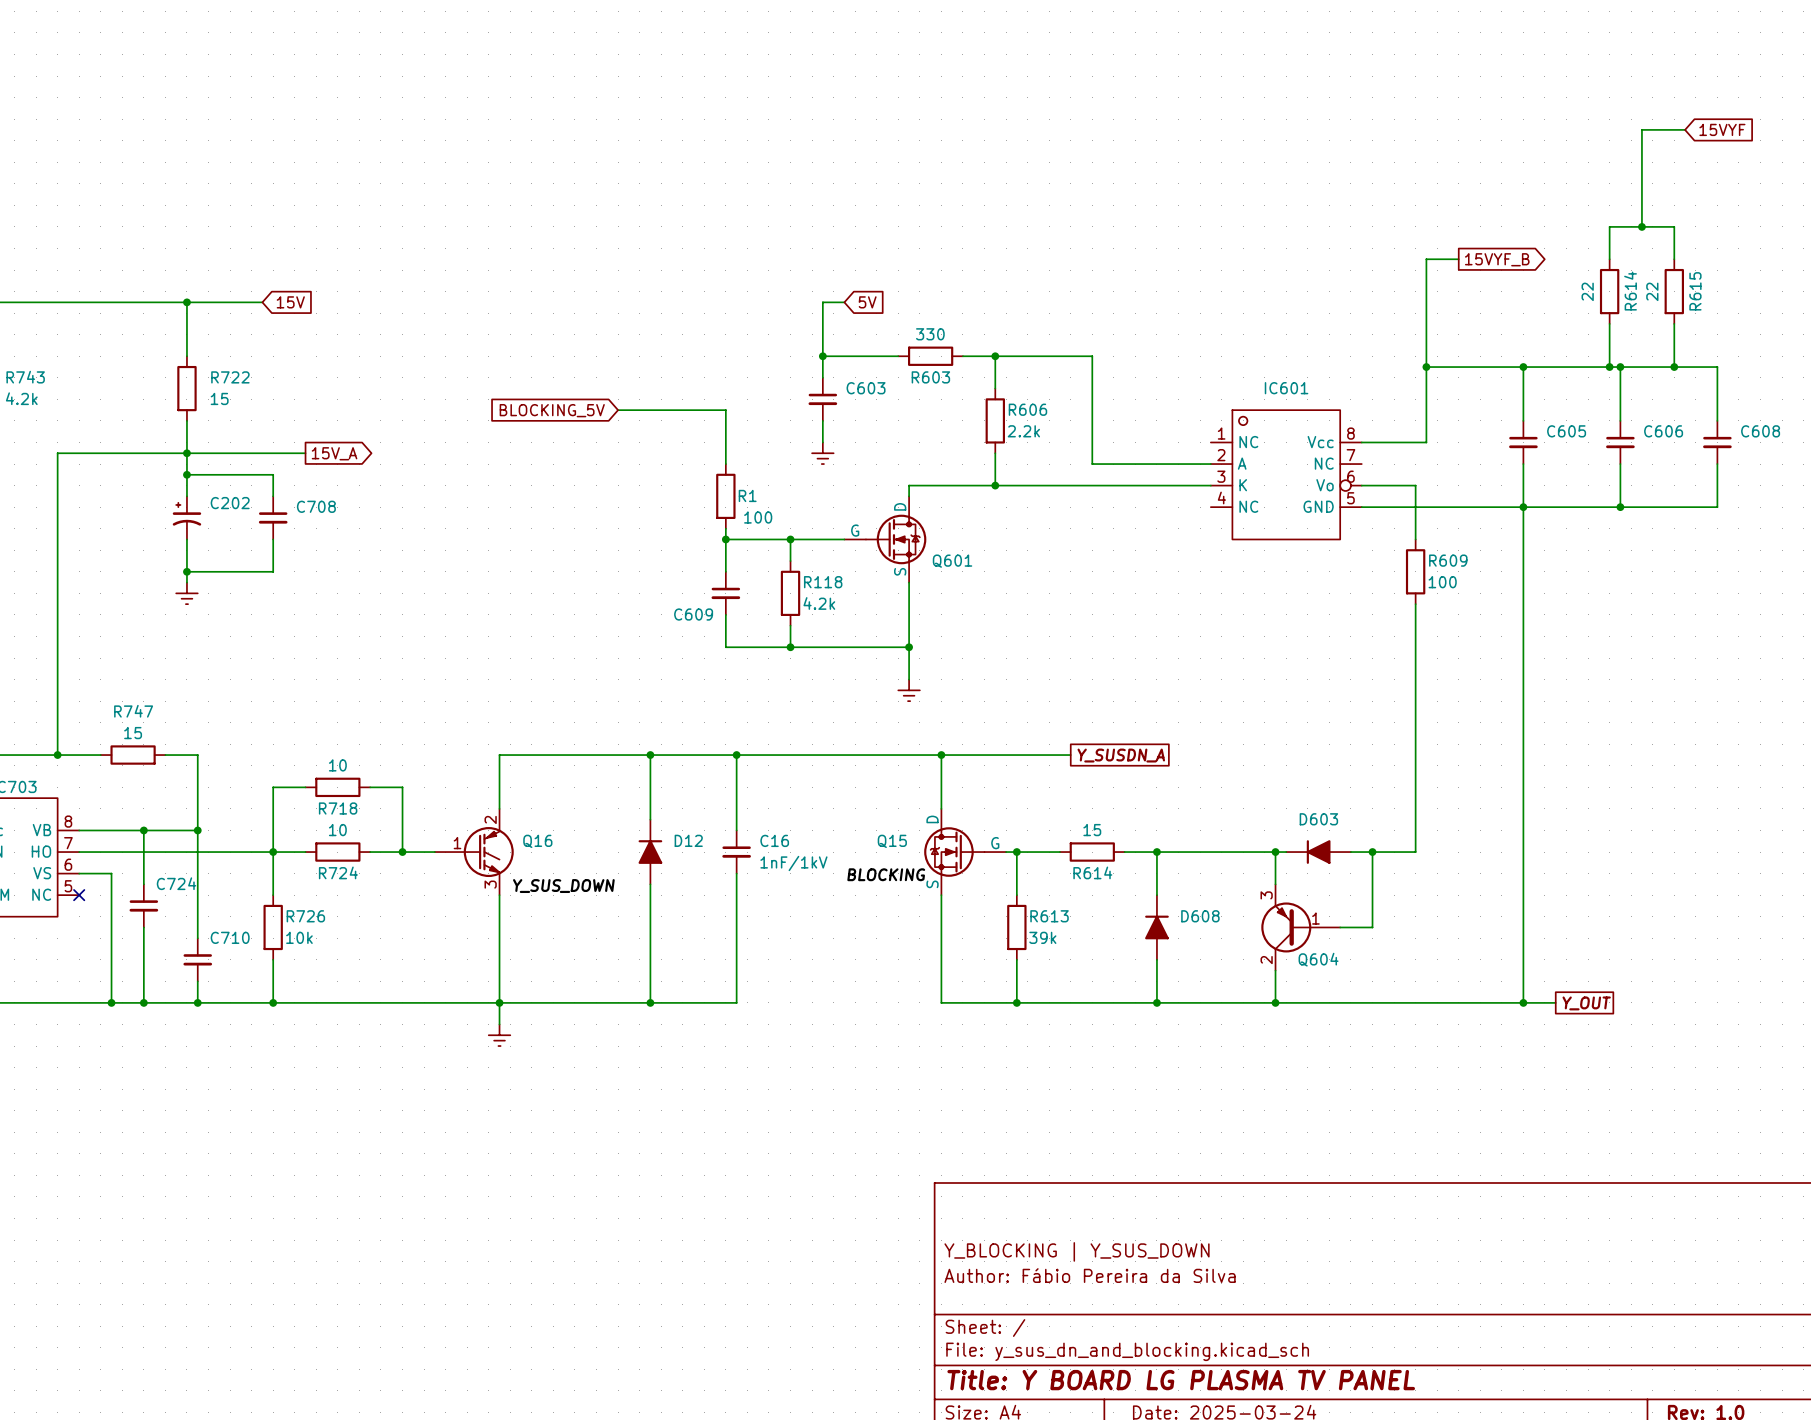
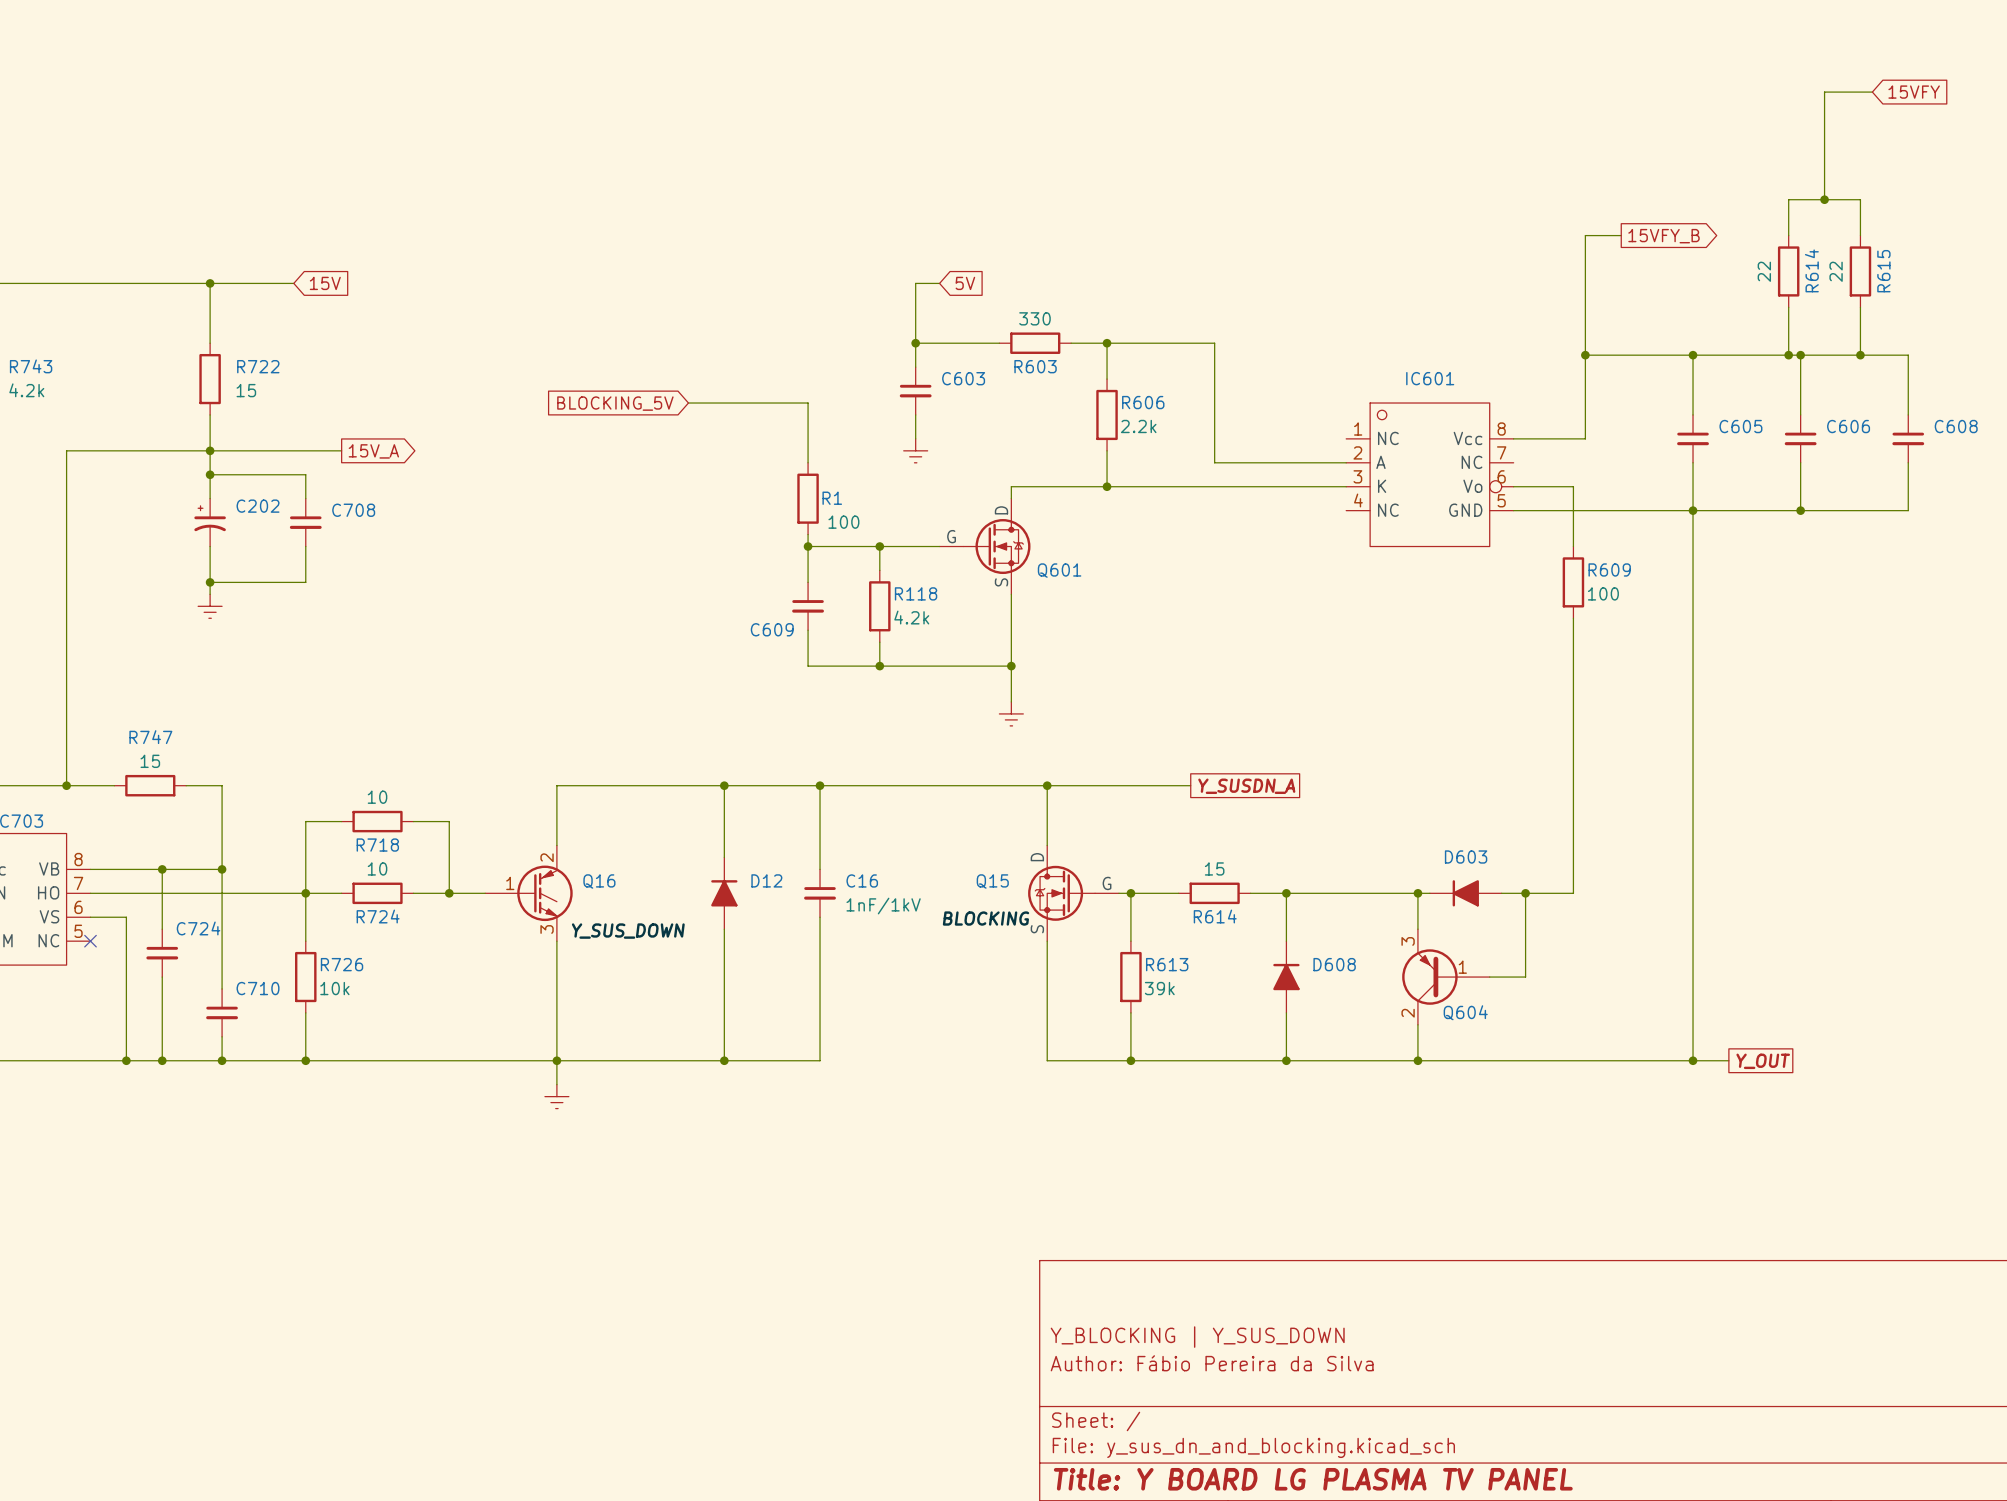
global label: 15VYF (1722, 129) -> 15VFY (1914, 92)
global label: 15VYF_B (1497, 259) -> 15VFY_B (1663, 236)

